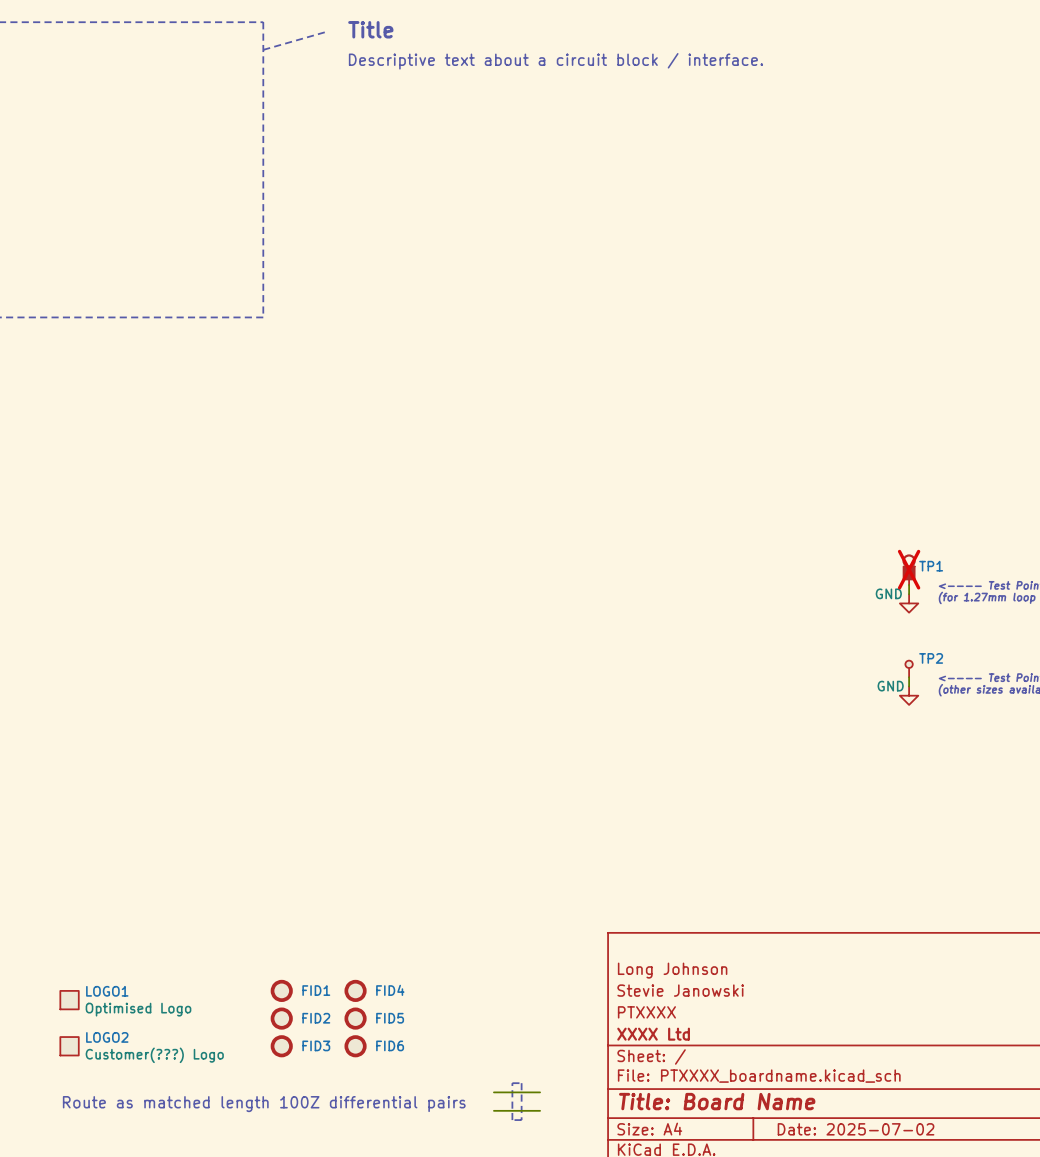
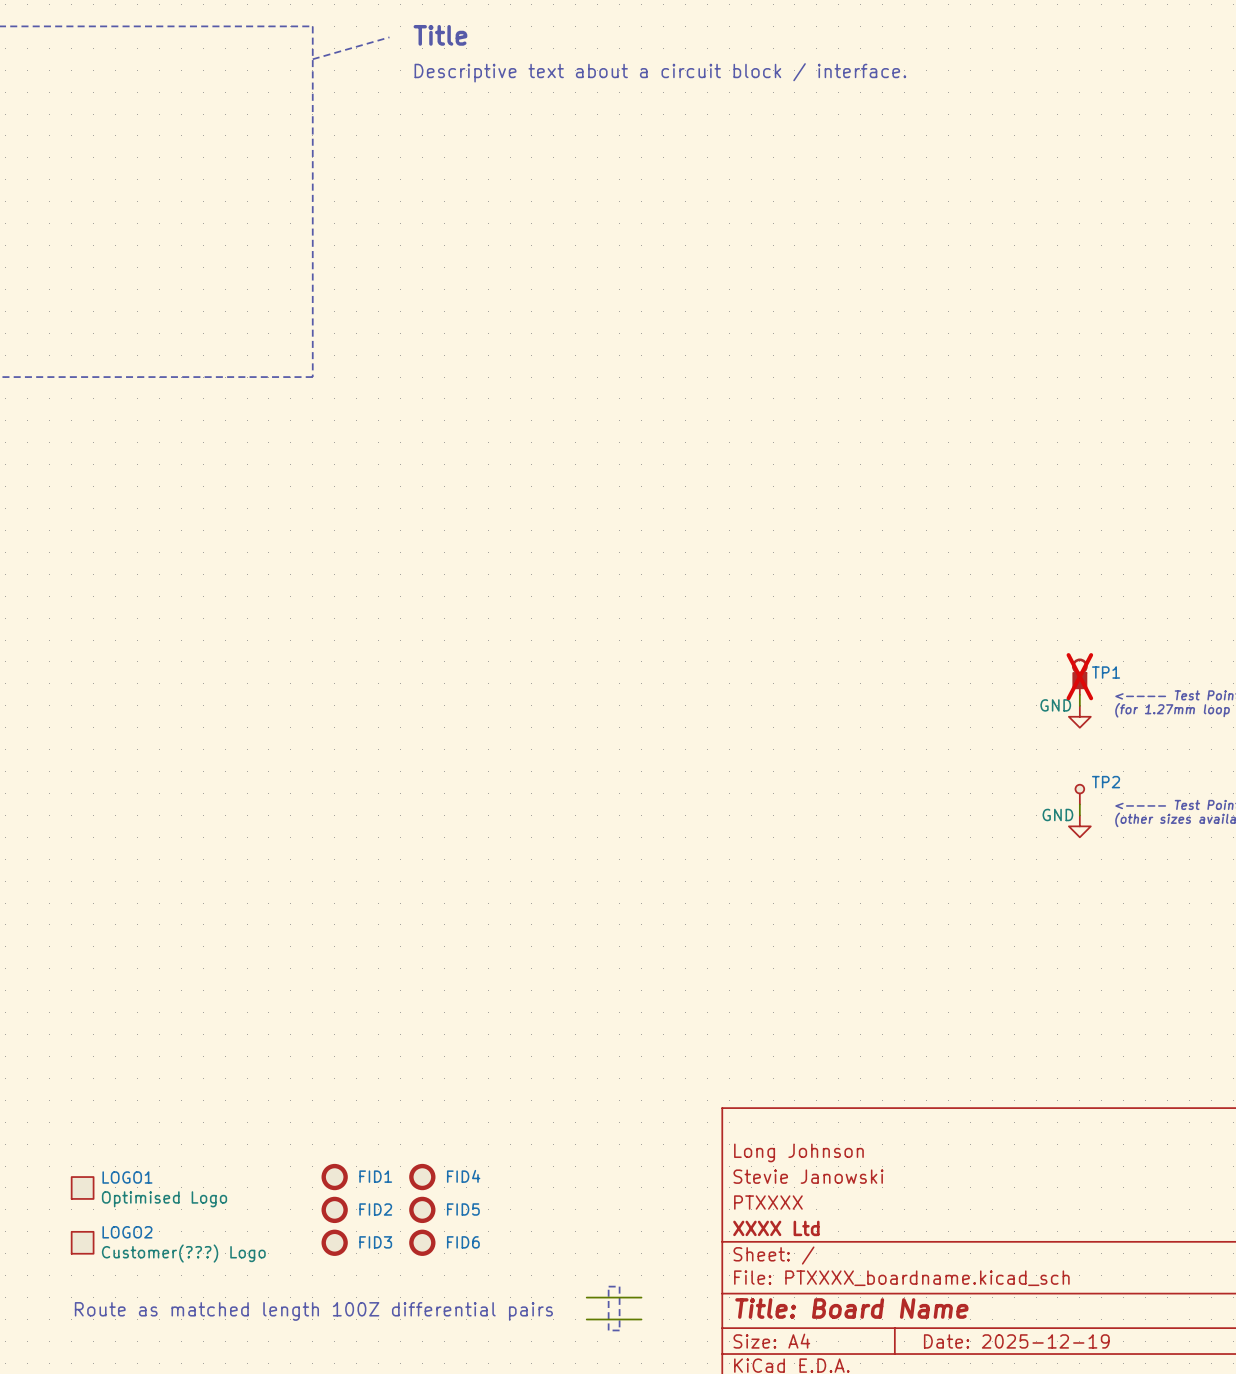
title block: Date: 2025-07-02 (856, 1129) -> Date: 2025-12-19 (1016, 1341)

